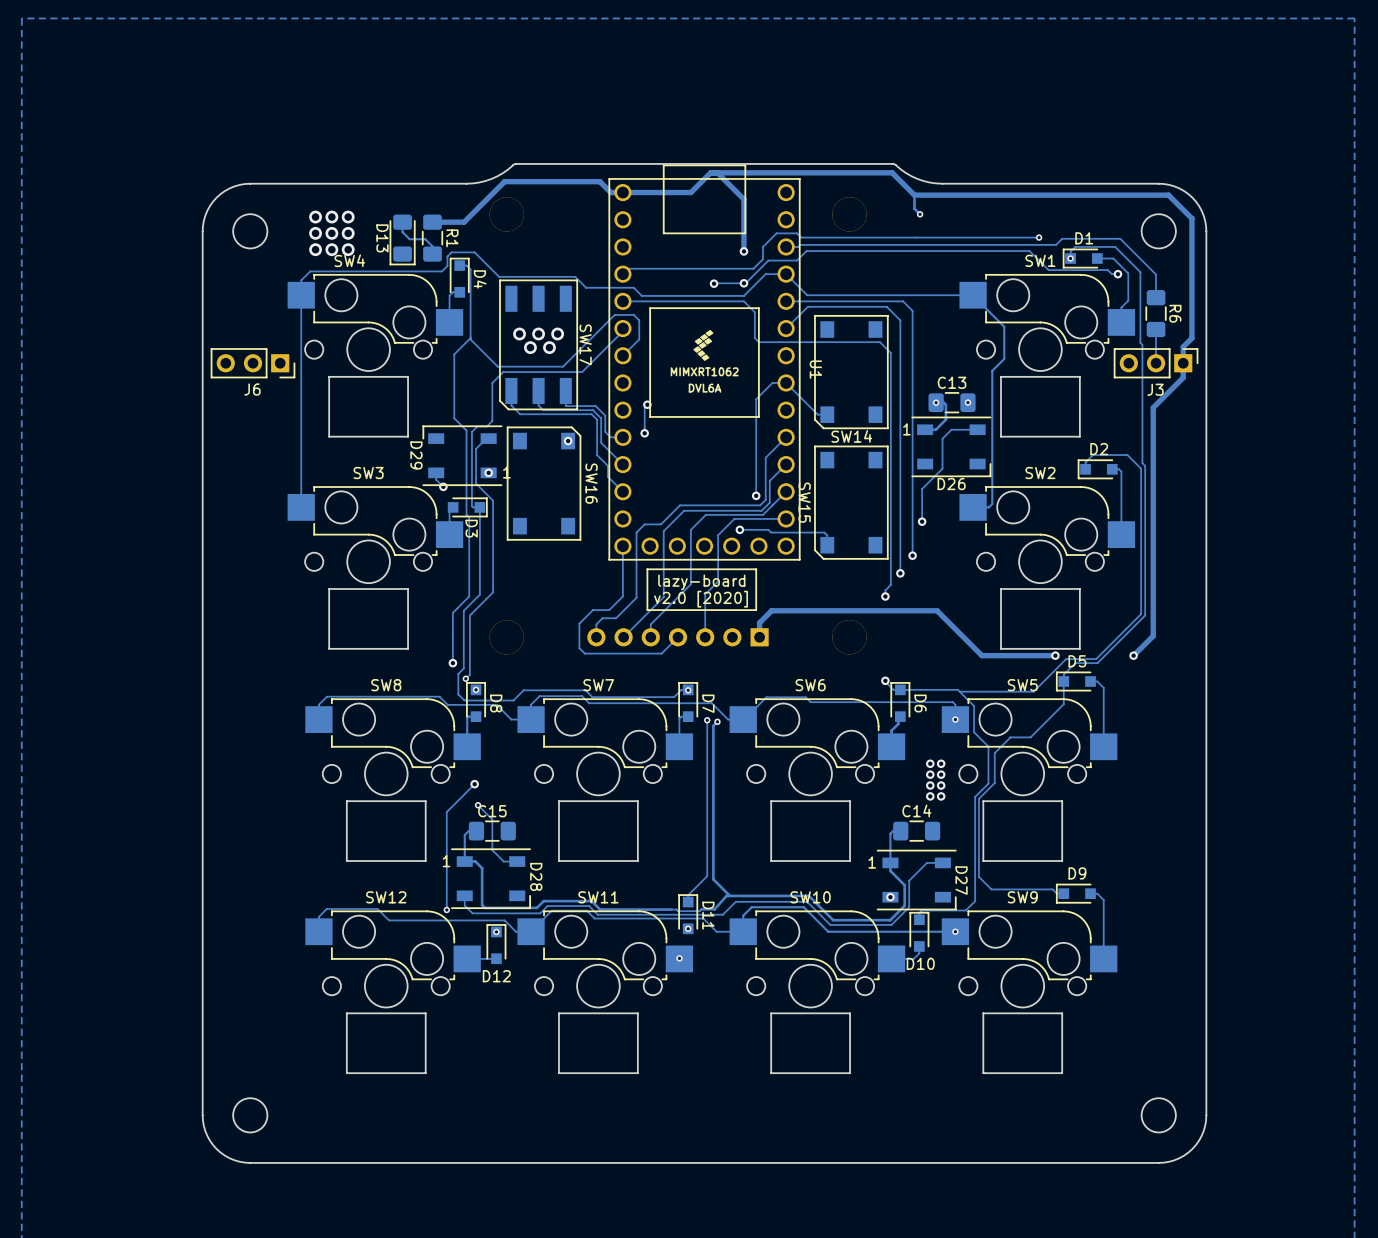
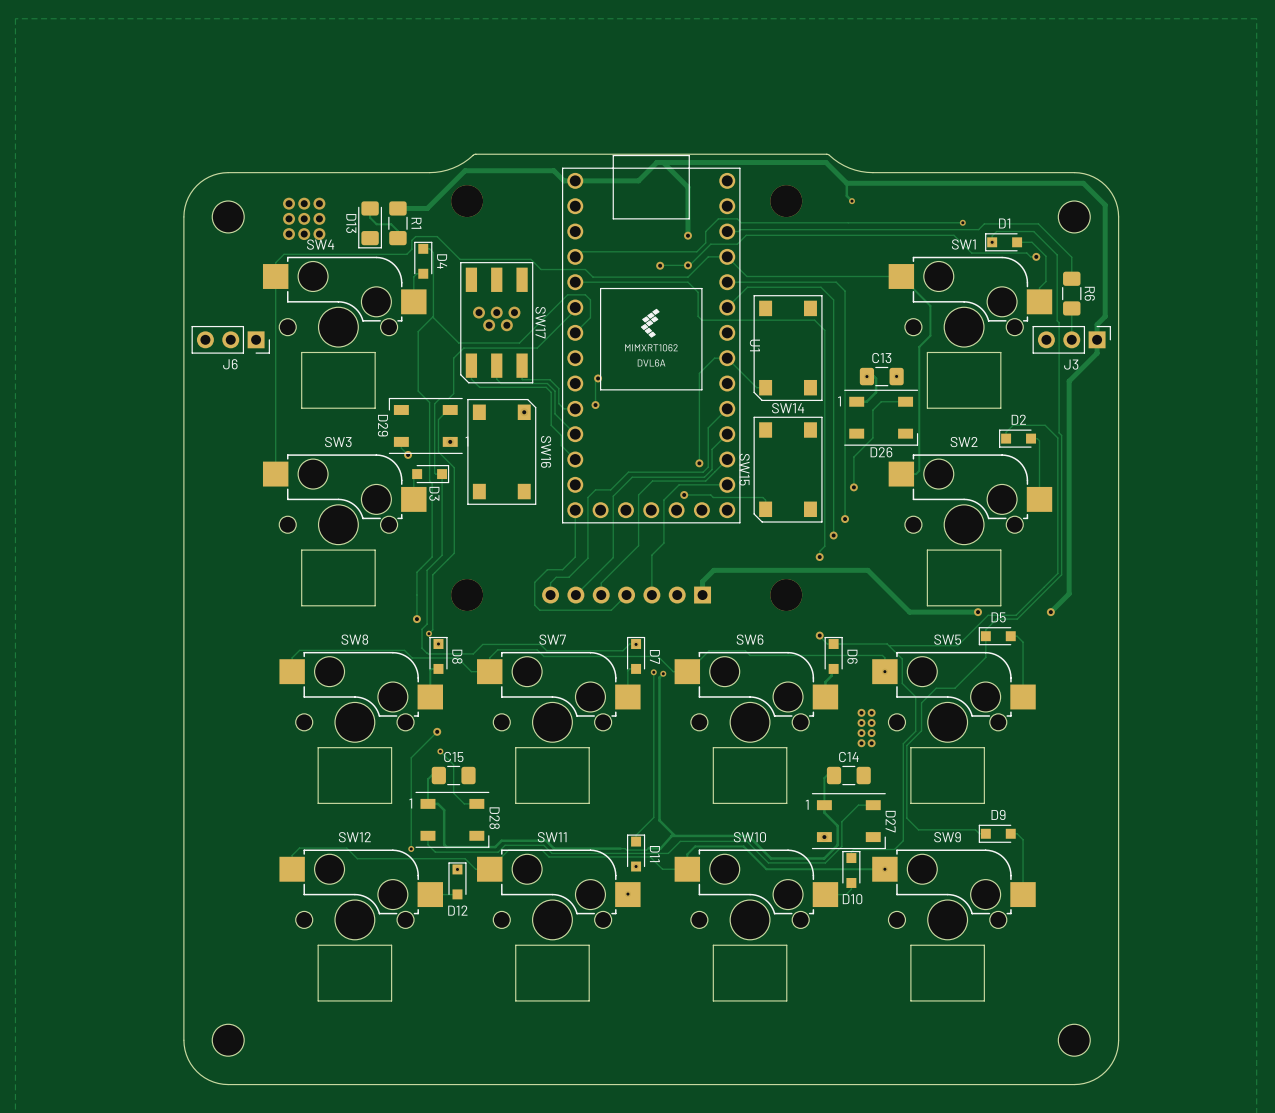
line: (756, 569) (756, 610) (647, 610) (647, 569) (756, 569) -> none
text: lazy-board (701, 582) -> none
text: v2.0 [2020] (701, 599) -> none

